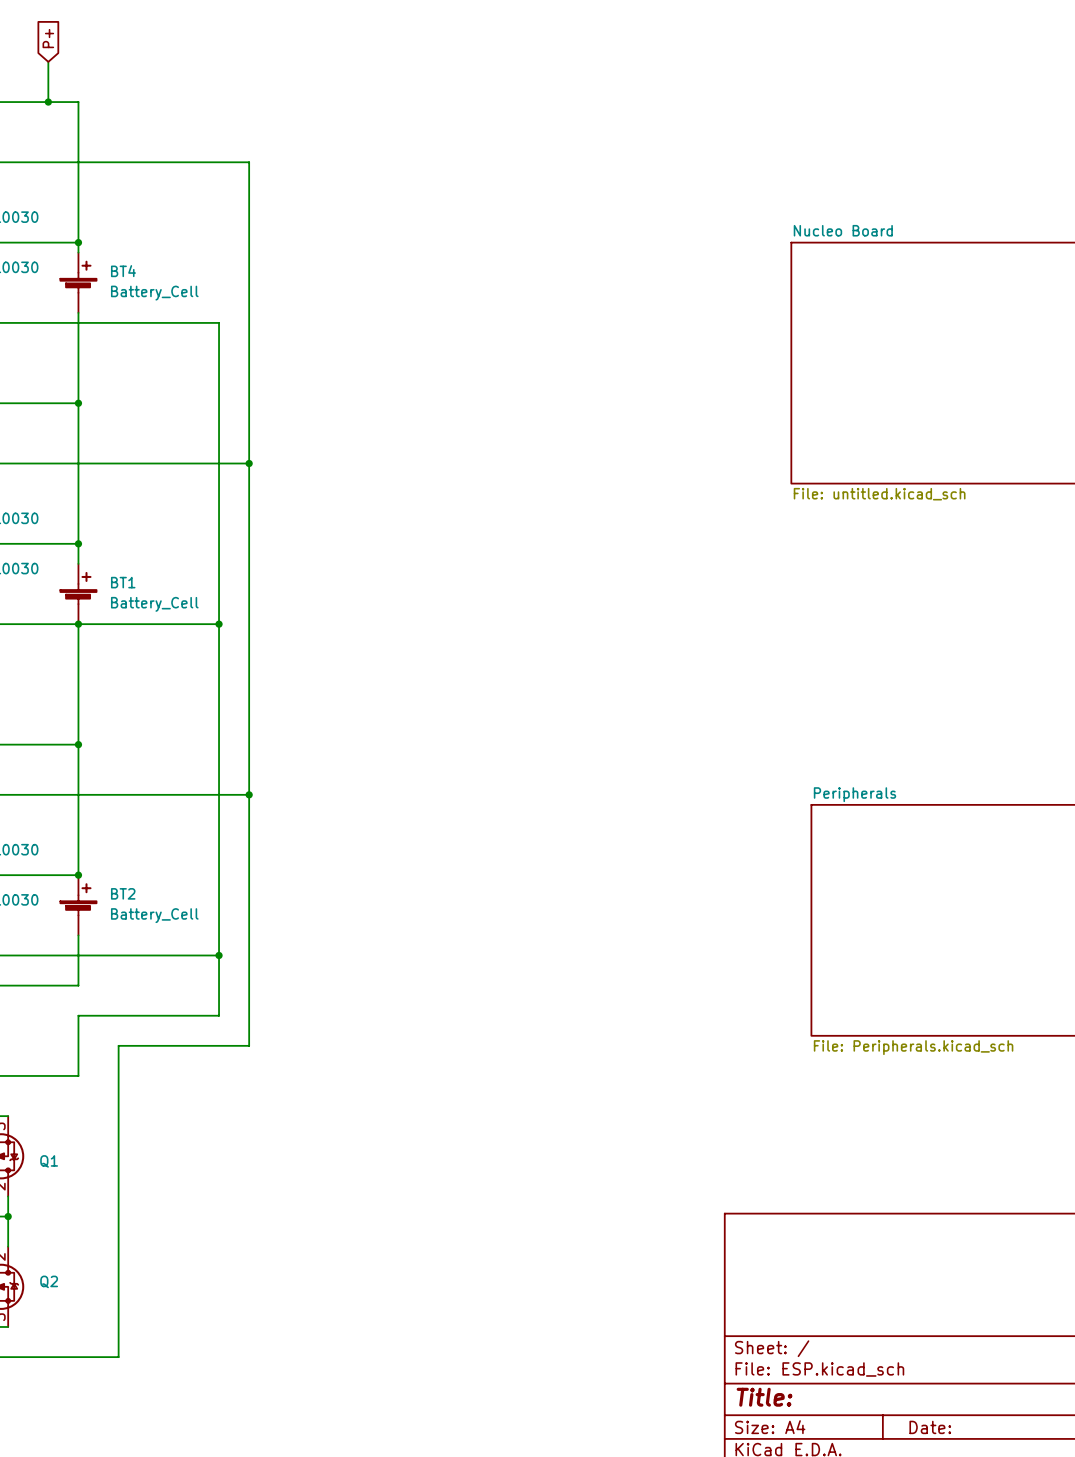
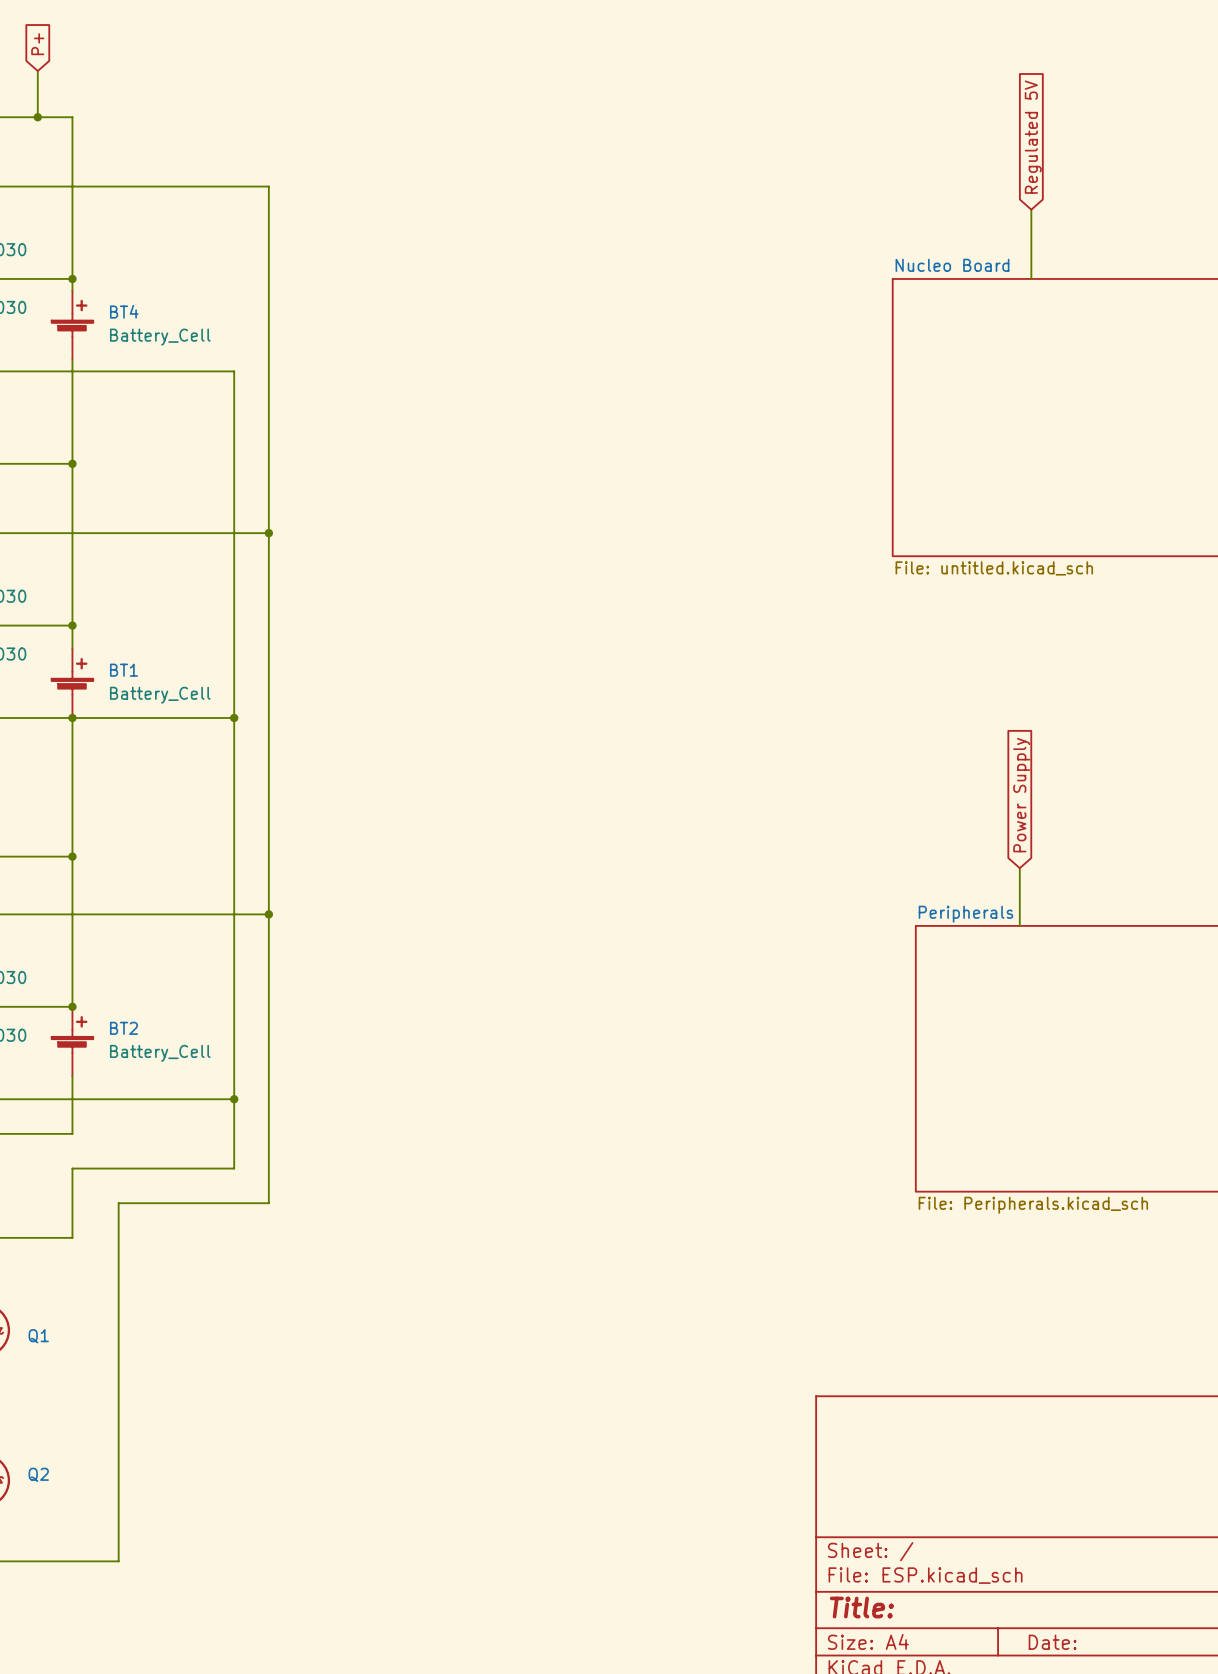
global label: none -> Regulated 5V (1033, 137)
wire: none -> (1031, 209) (1031, 278)
global label: none -> Power Supply (1021, 795)
wire: none -> (1019, 868) (1019, 925)

